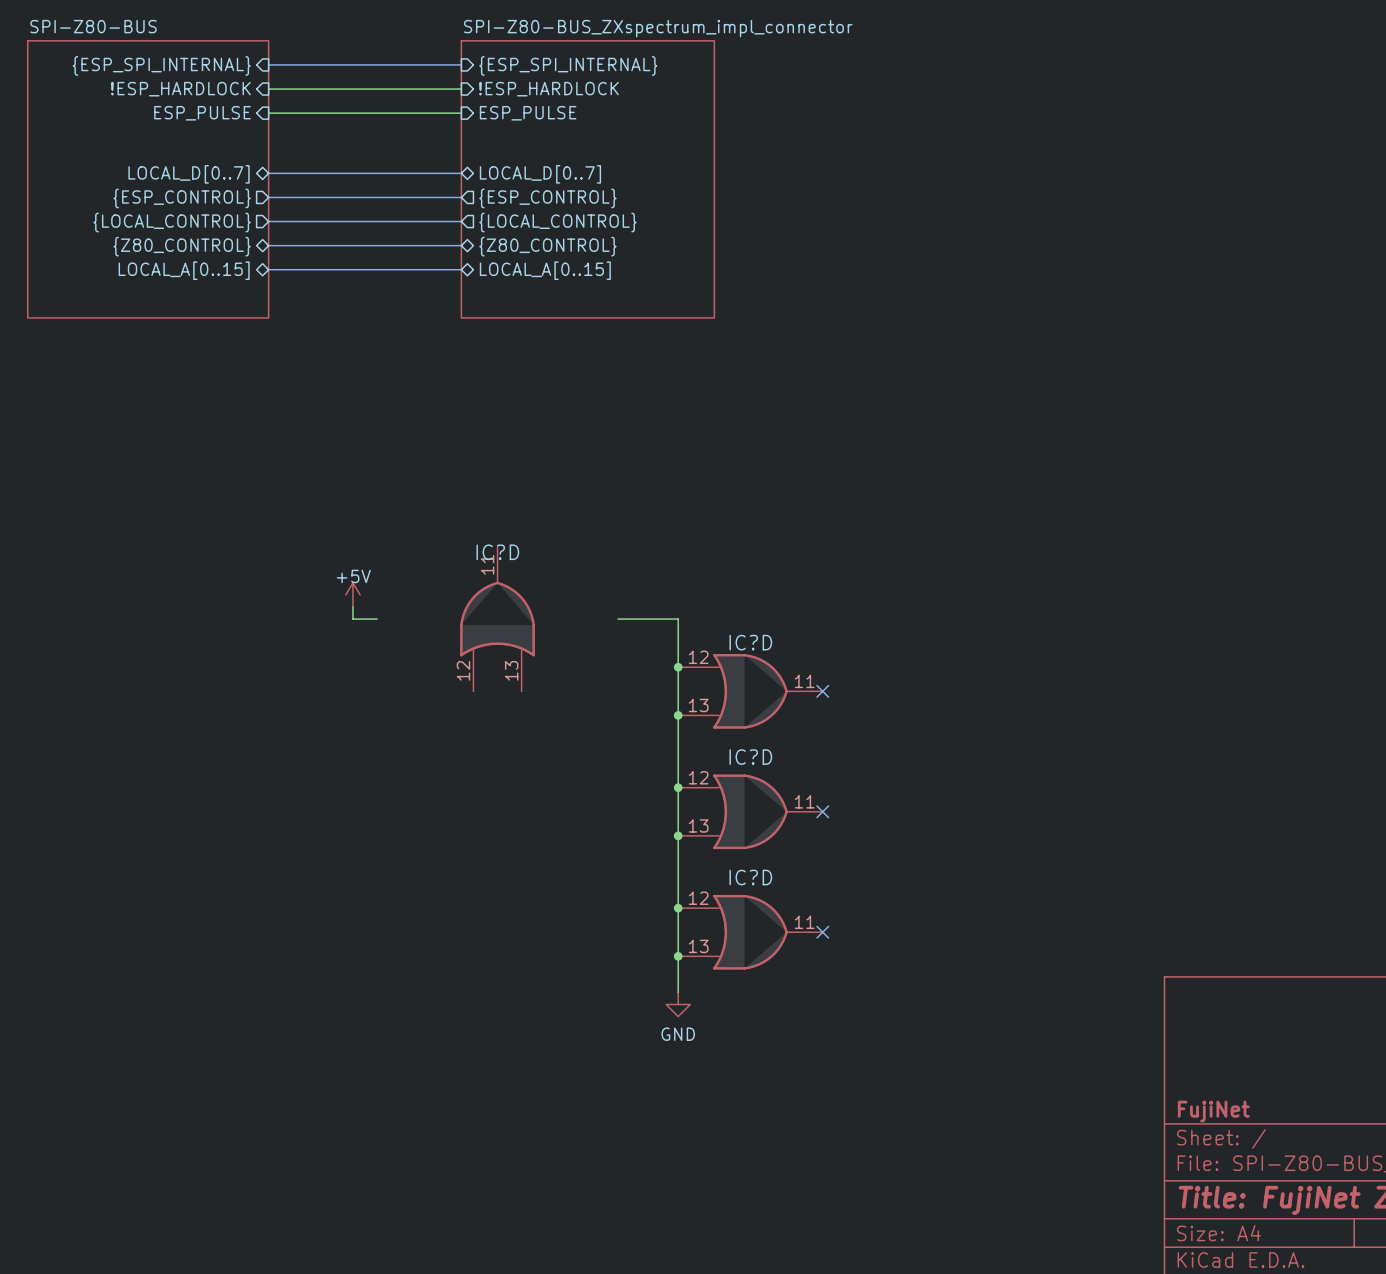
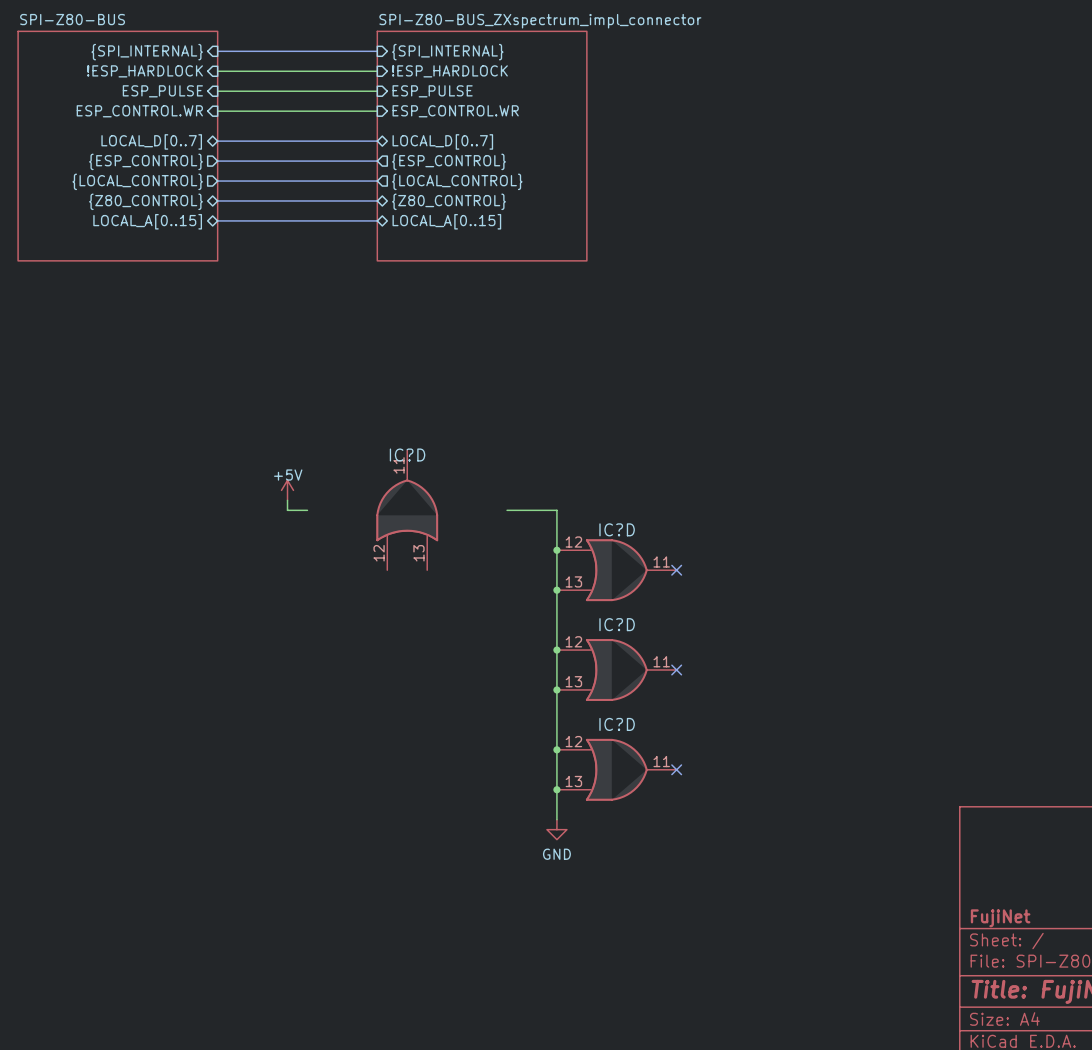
sheet pin: {ESP_SPI_INTERNAL} (161, 65) -> {SPI_INTERNAL} (147, 52)
sheet pin: {ESP_SPI_INTERNAL} (568, 65) -> {SPI_INTERNAL} (447, 52)
sheet pin: none -> ESP_CONTROL.WR (139, 111)
wire: none -> (217, 111) (377, 111)
sheet pin: none -> ESP_CONTROL.WR (455, 111)

